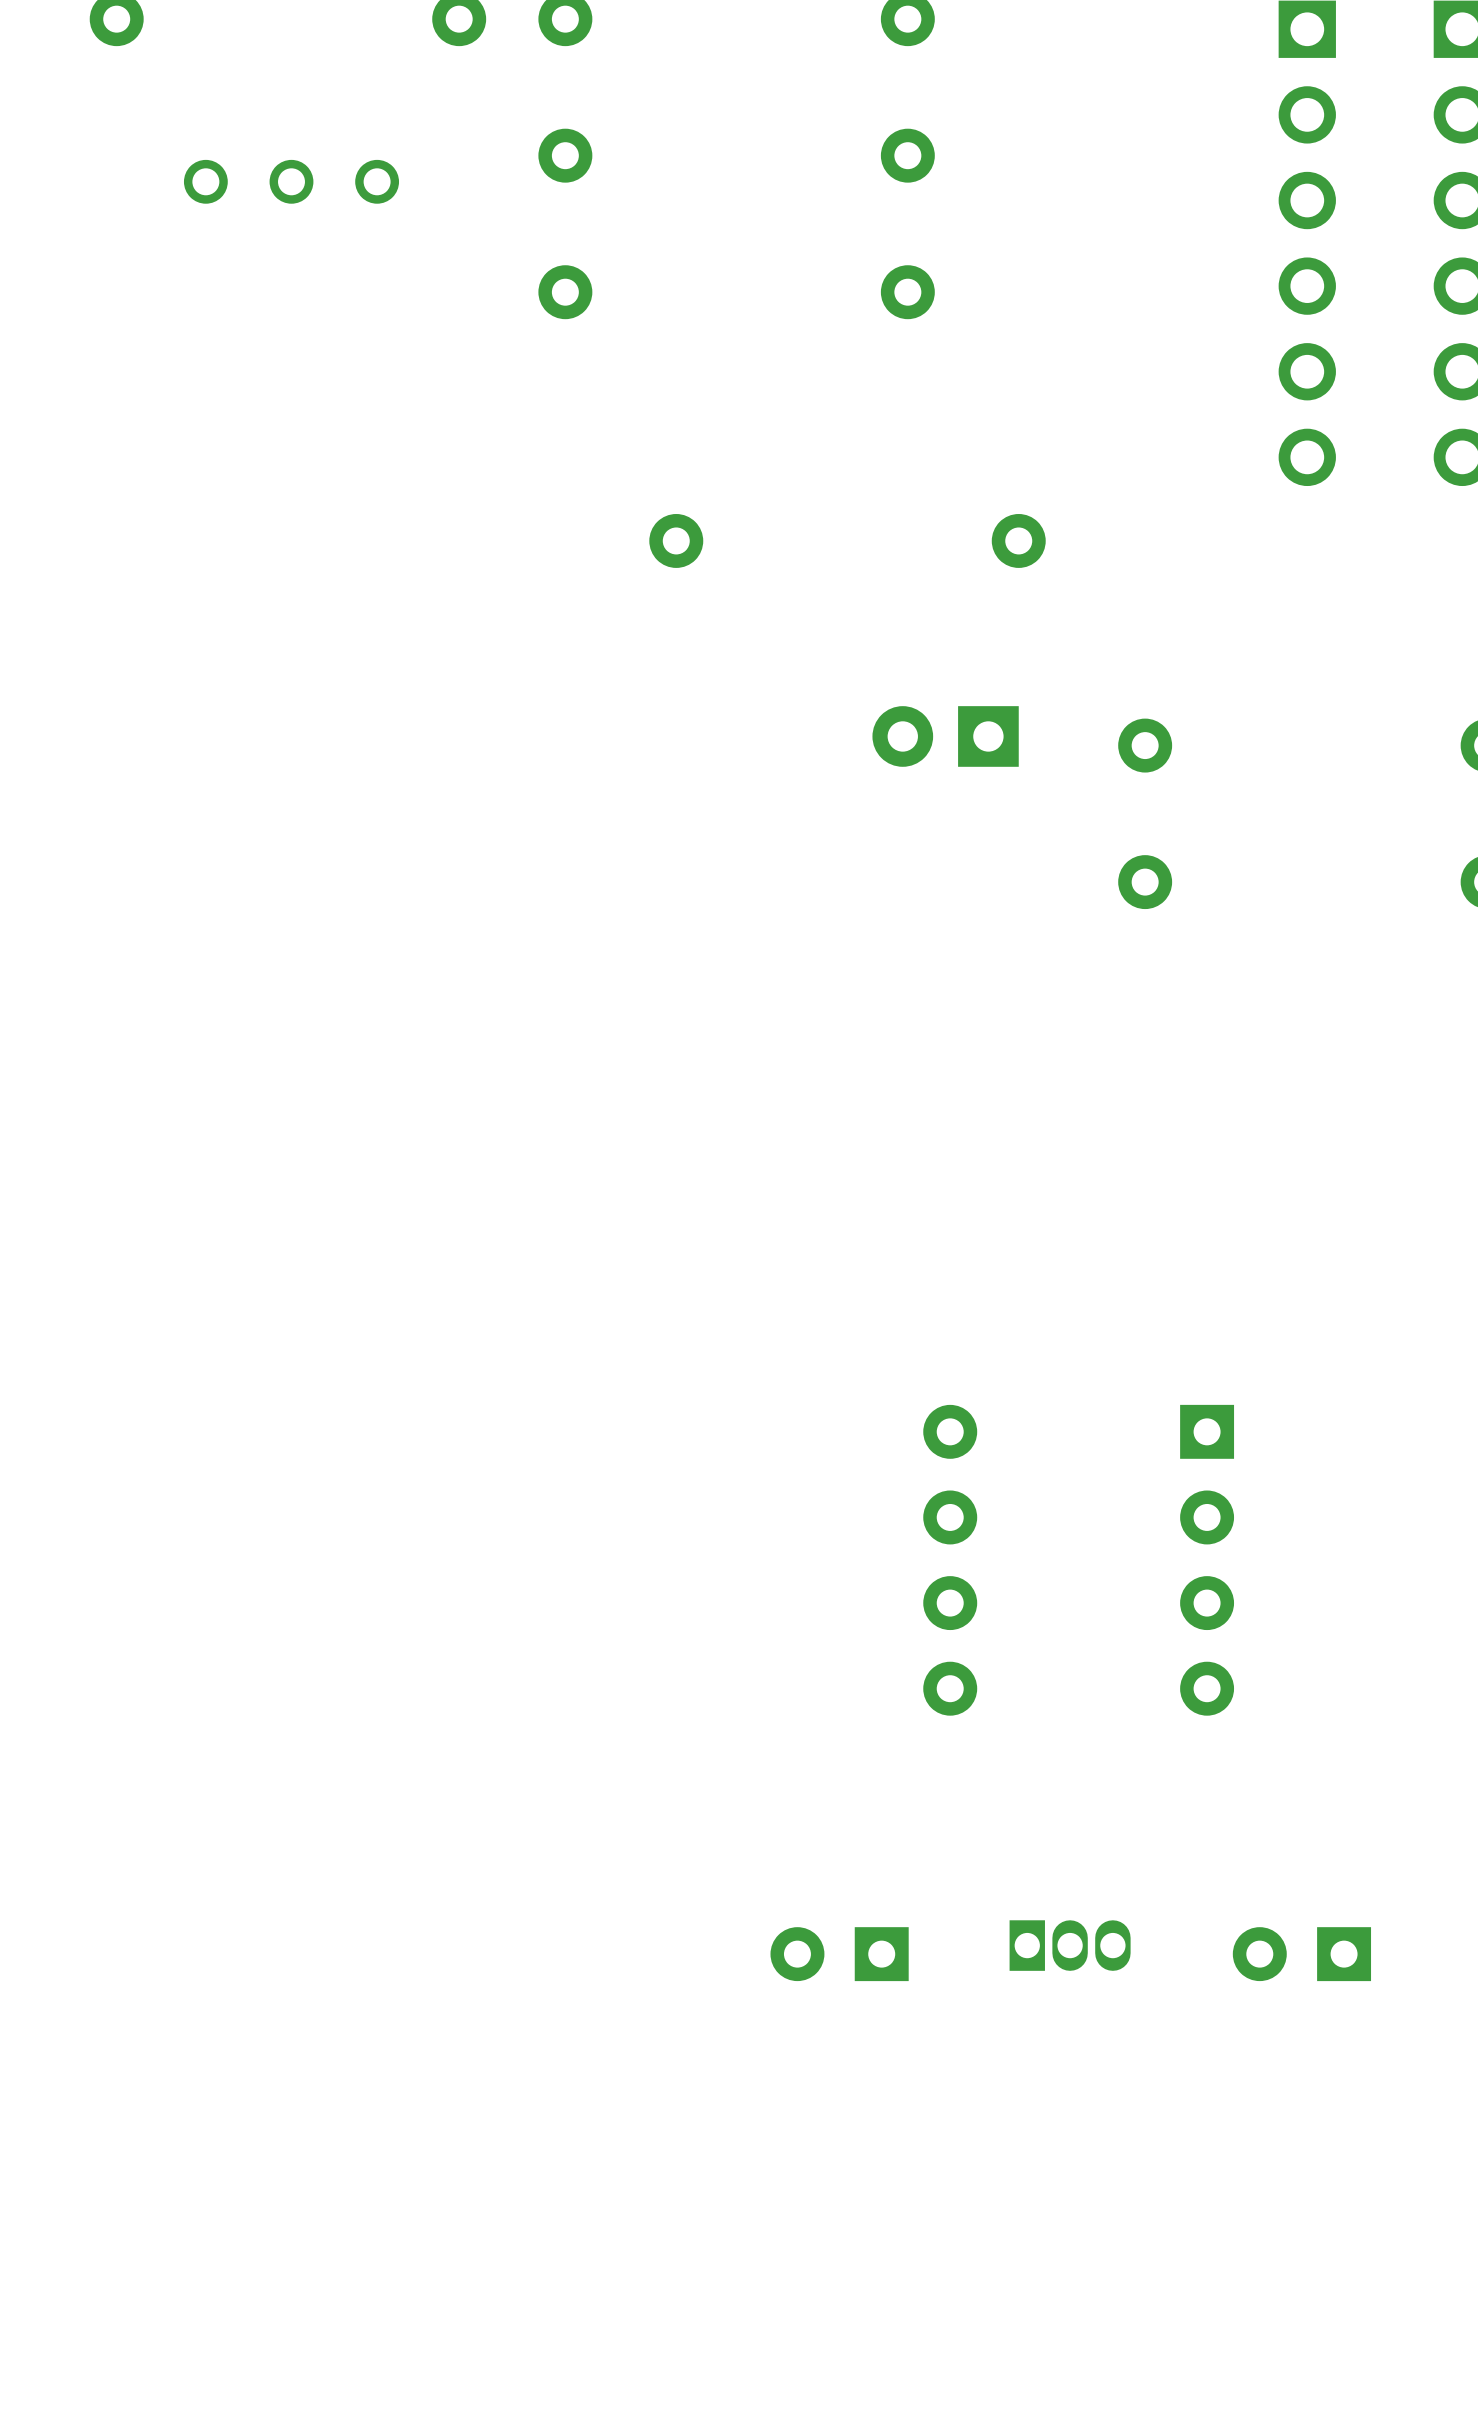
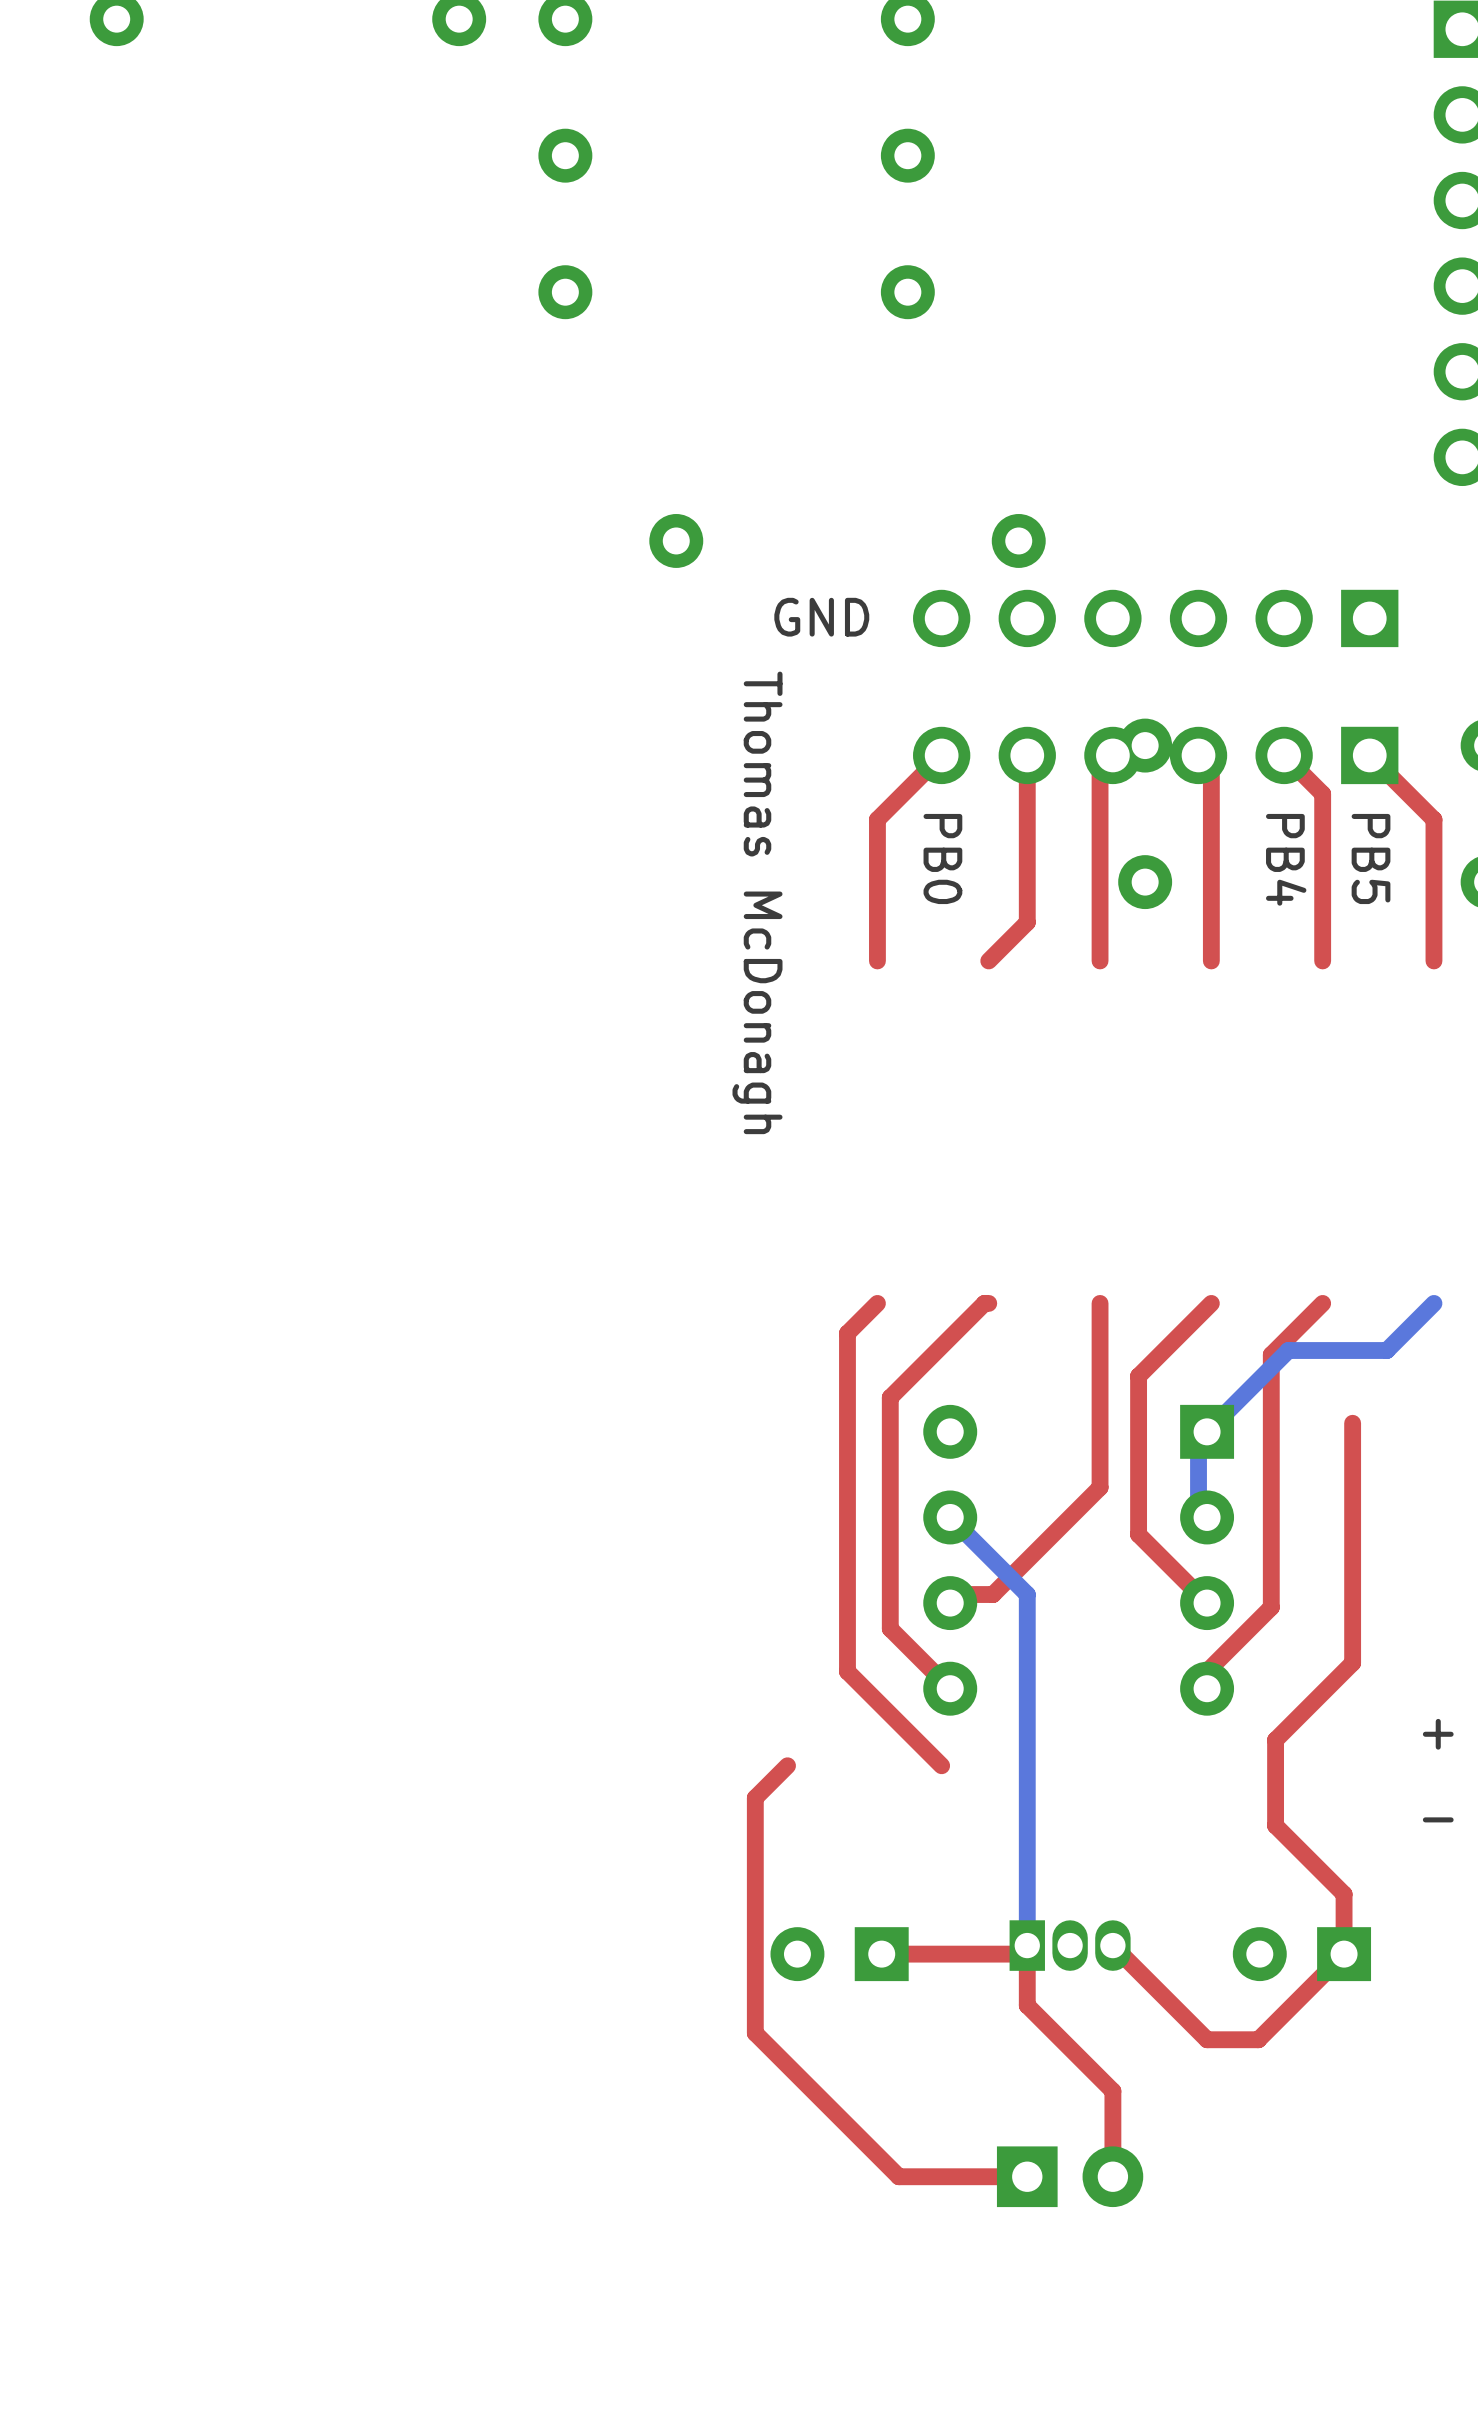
part: (291, 181) -> none
part: (1307, 243) -> none
text: none -> GND (821, 617)
part: none -> (1155, 618)
part: (945, 736) -> none
top track: none -> (941, 755) (877, 819) (877, 960)
top track: none -> (1027, 755) (1027, 922) (988, 960)
top track: none -> (1112, 755) (1100, 768) (1100, 960)
part: none -> (1155, 755)
top track: none -> (1198, 755) (1211, 768) (1211, 960)
top track: none -> (1284, 755) (1322, 793) (1322, 960)
top track: none -> (1369, 755) (1433, 819) (1433, 960)
text: none -> PB0 (942, 859)
text: none -> PB4 (1286, 859)
text: none -> PB5 (1371, 859)
text: none -> Thomas McDonagh (757, 902)
top track: none -> (877, 1303) (847, 1333) (847, 1671) (941, 1765)
top track: none -> (988, 1303) (984, 1303) (890, 1397) (890, 1628) (941, 1680)
top track: none -> (1100, 1303) (1100, 1487) (993, 1594) (941, 1594)
top track: none -> (1211, 1303) (1138, 1376) (1138, 1534) (1198, 1594)
top track: none -> (1322, 1303) (1271, 1354) (1271, 1607) (1198, 1680)
bottom track: none -> (1433, 1303) (1386, 1350) (1288, 1350) (1198, 1440) (1198, 1508)
top track: none -> (1352, 1423) (1352, 1663) (1275, 1740) (1275, 1825) (1344, 1894) (1344, 1954) (1258, 2039) (1207, 2039) (1112, 1945)
bottom track: none -> (941, 1508) (1027, 1594) (1027, 1945)
text: none -> + (1438, 1734)
top track: none -> (787, 1765) (755, 1797) (755, 2033) (898, 2176) (1027, 2176)
text: none -> - (1438, 1819)
top track: none -> (881, 1954) (1018, 1954) (1027, 1945) (1027, 2005) (1112, 2091) (1112, 2176)
part: none -> (1070, 2176)

